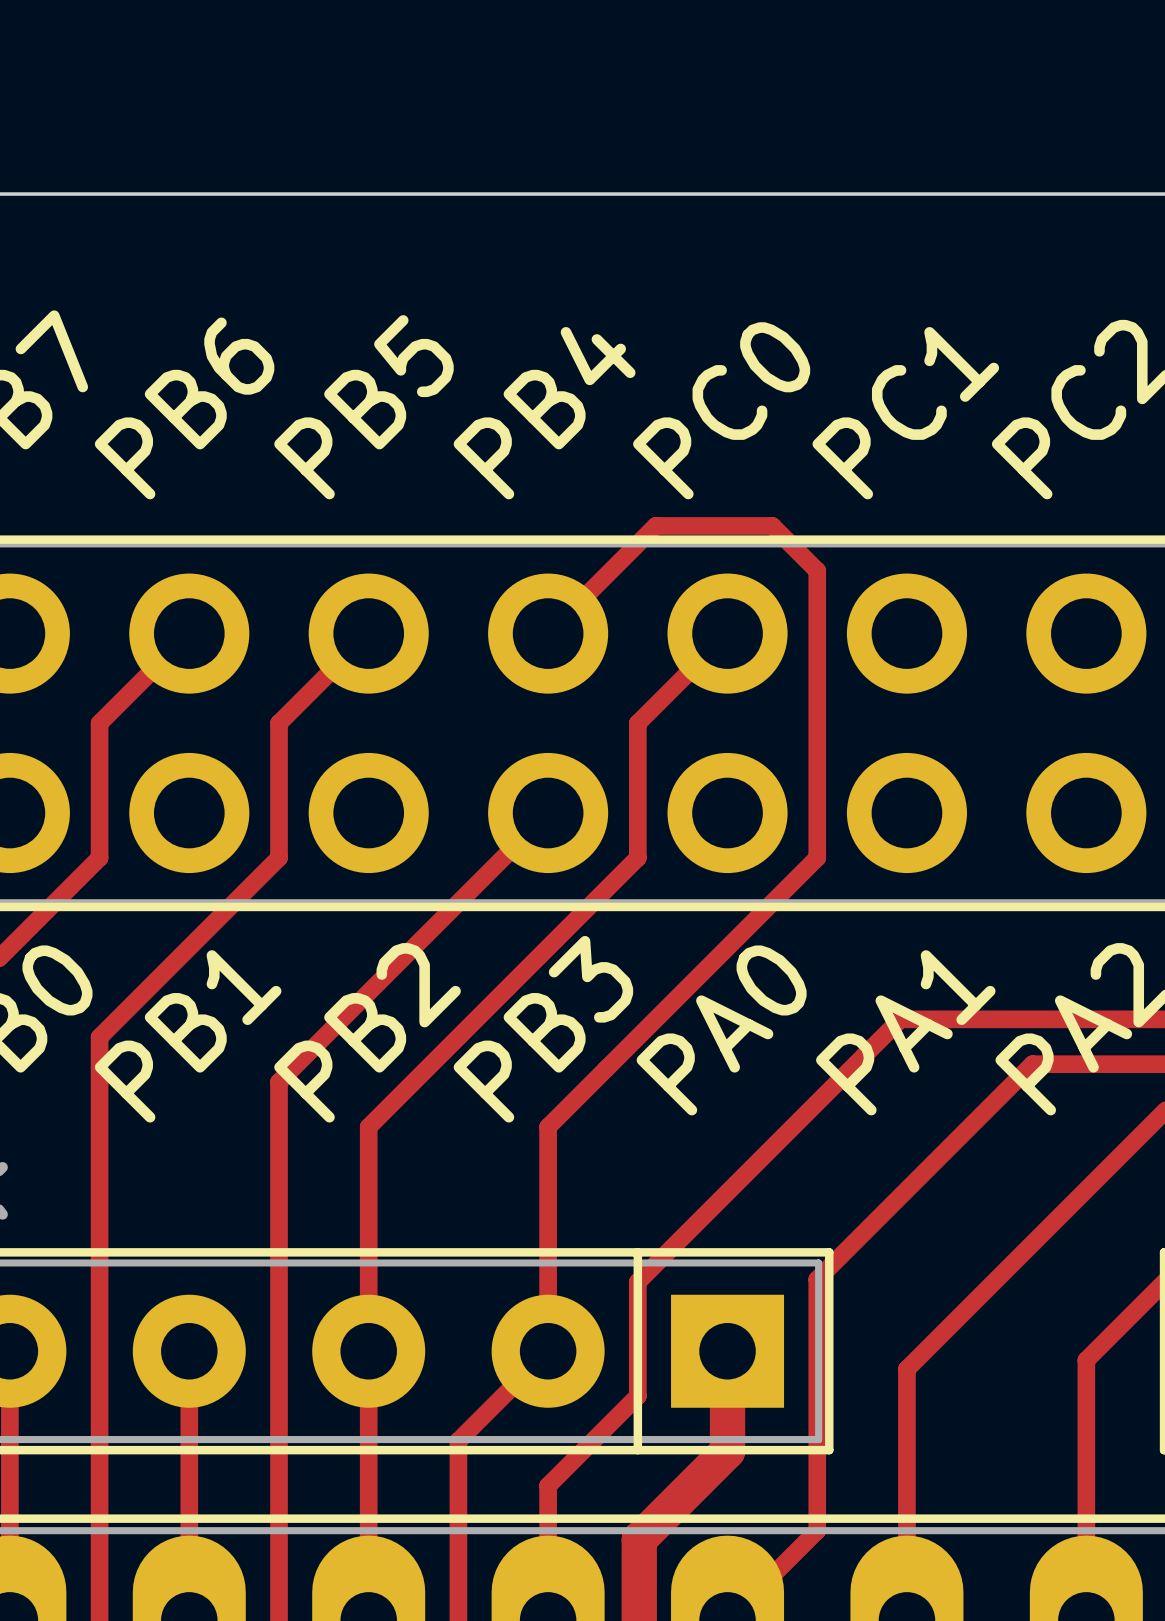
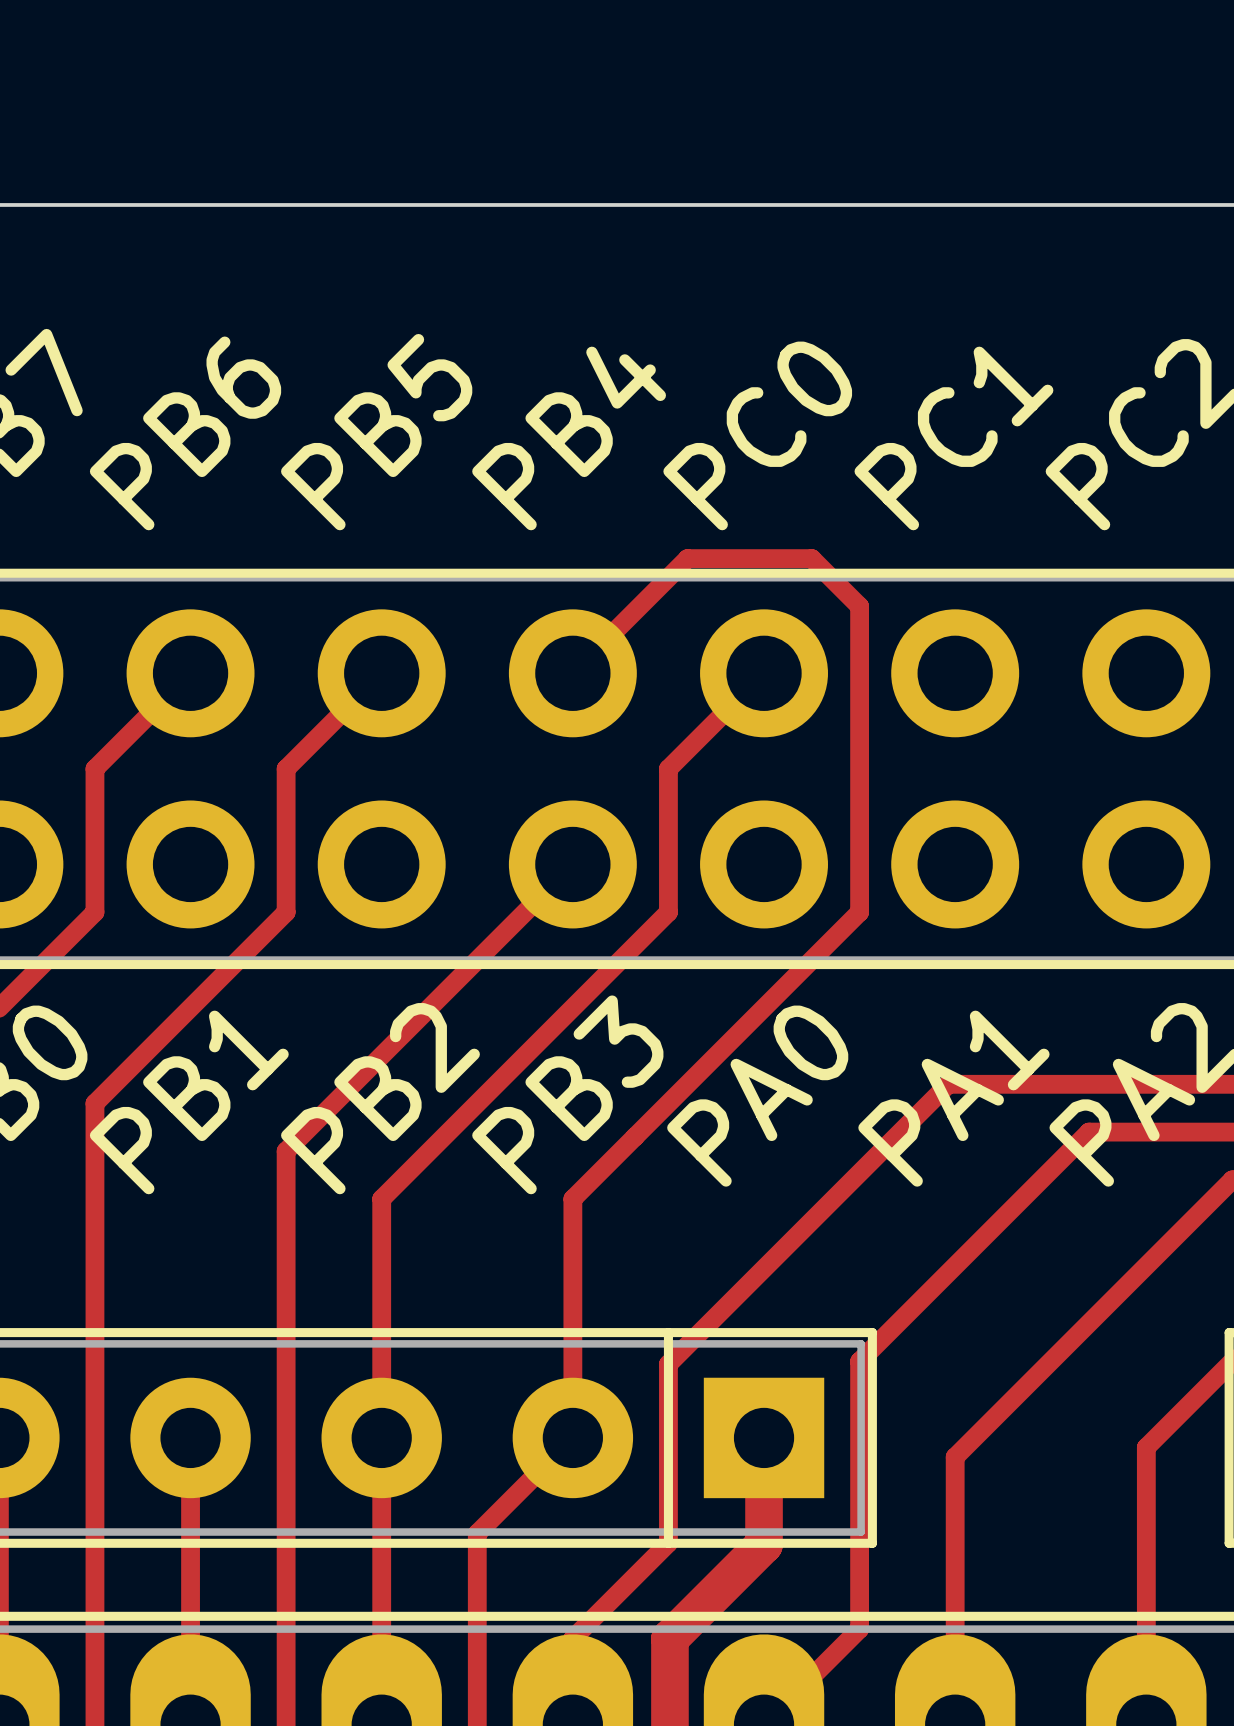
track: (637, 1396) (548, 1485) (548, 1539) -> (668, 1485) (668, 1543) (572, 1638)

